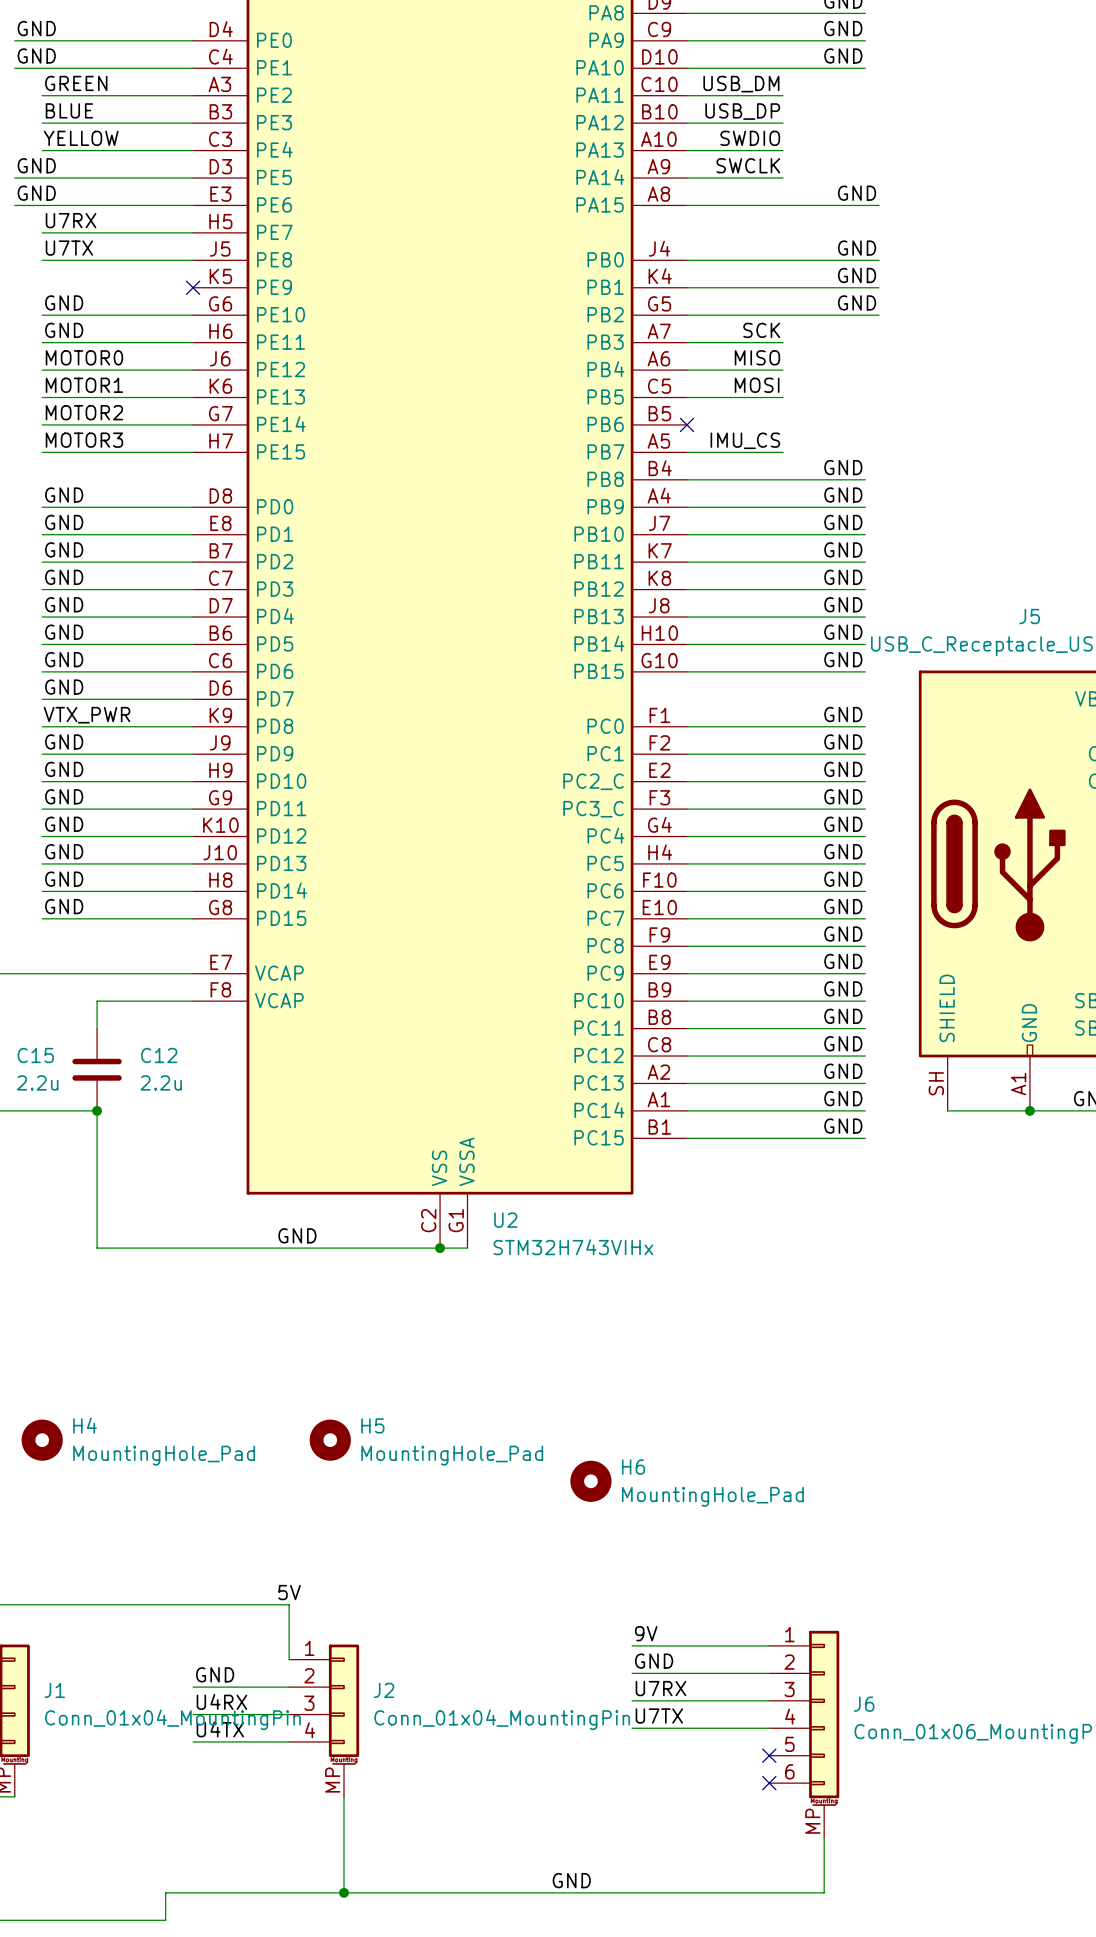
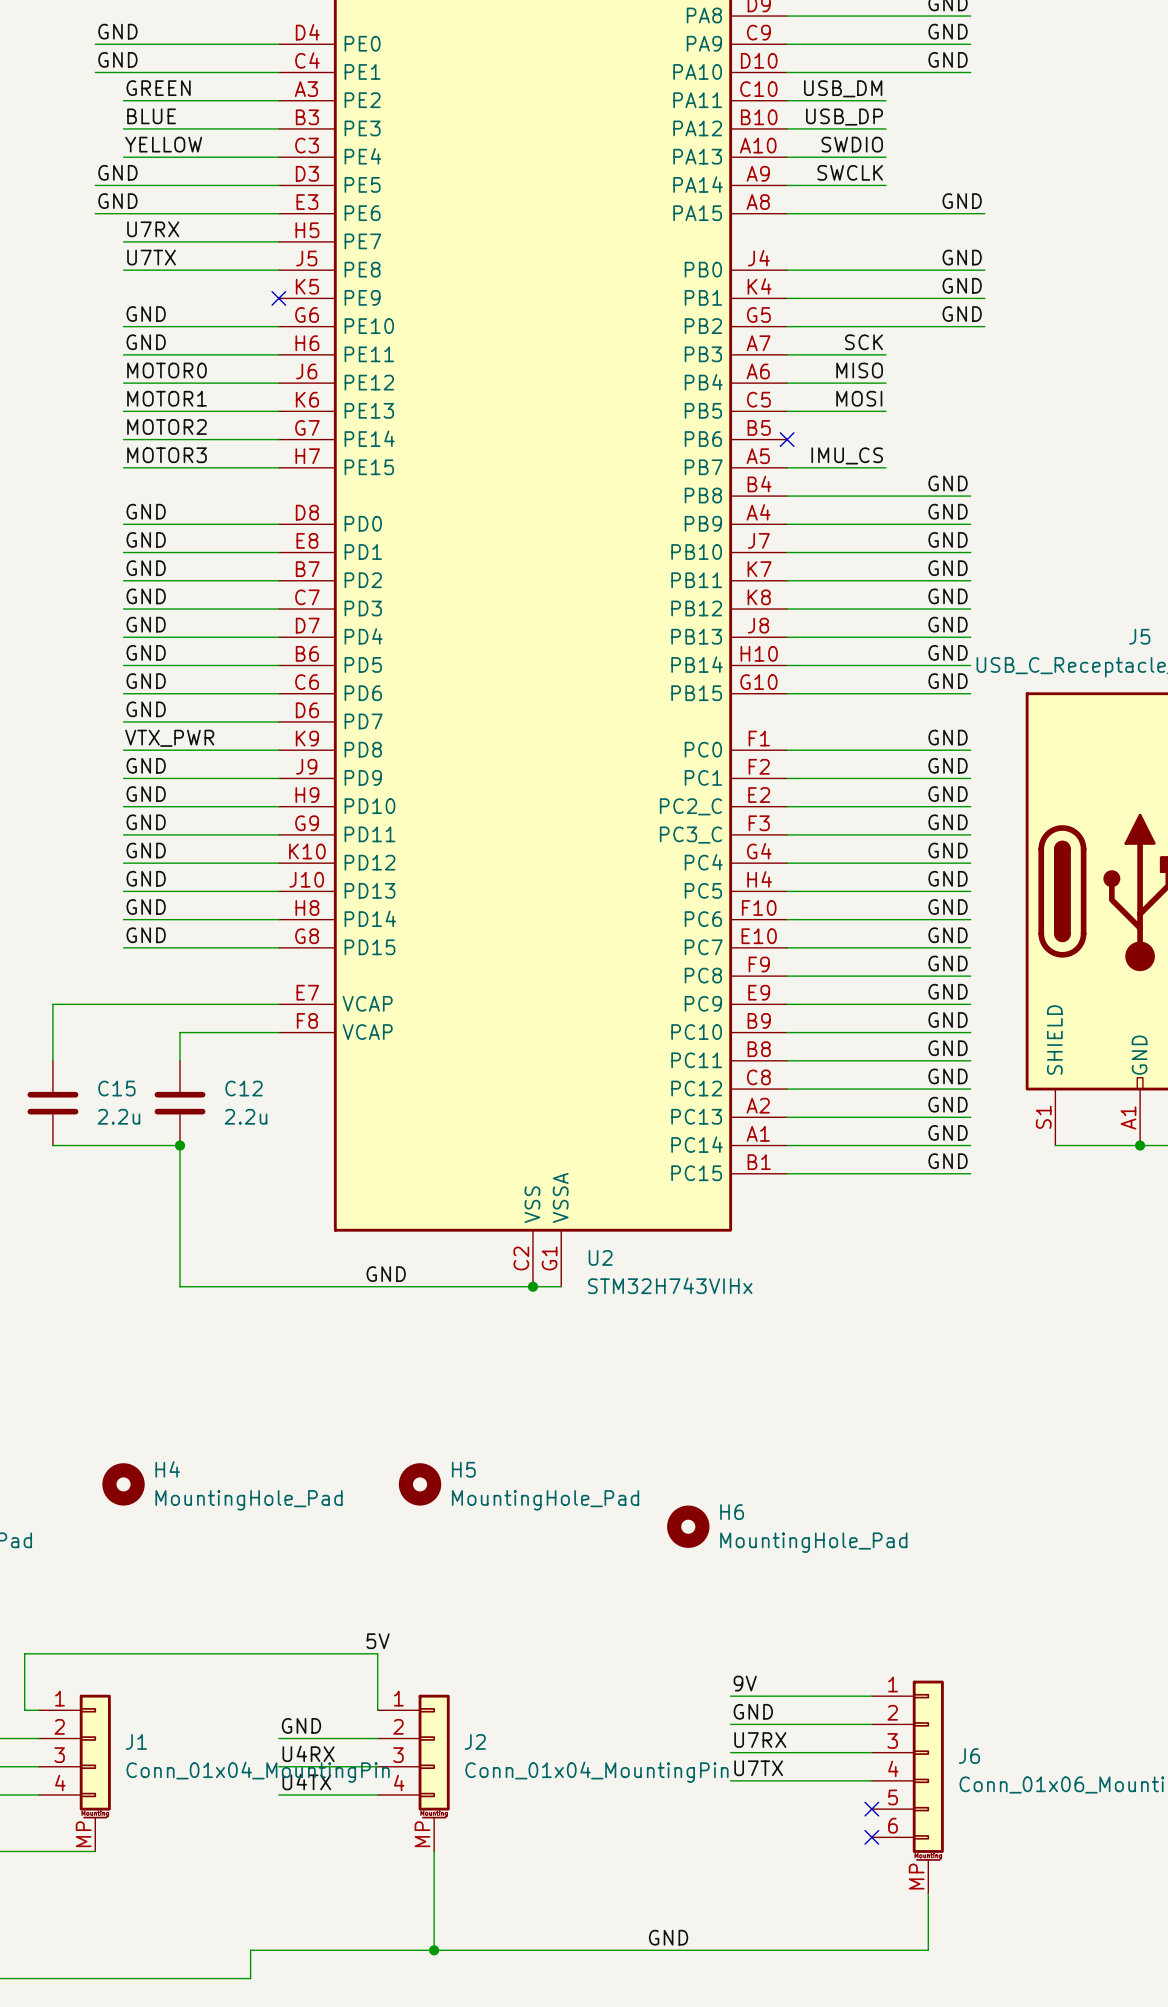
J5 pin number: SH (936, 1083) -> S1 (1043, 1117)

